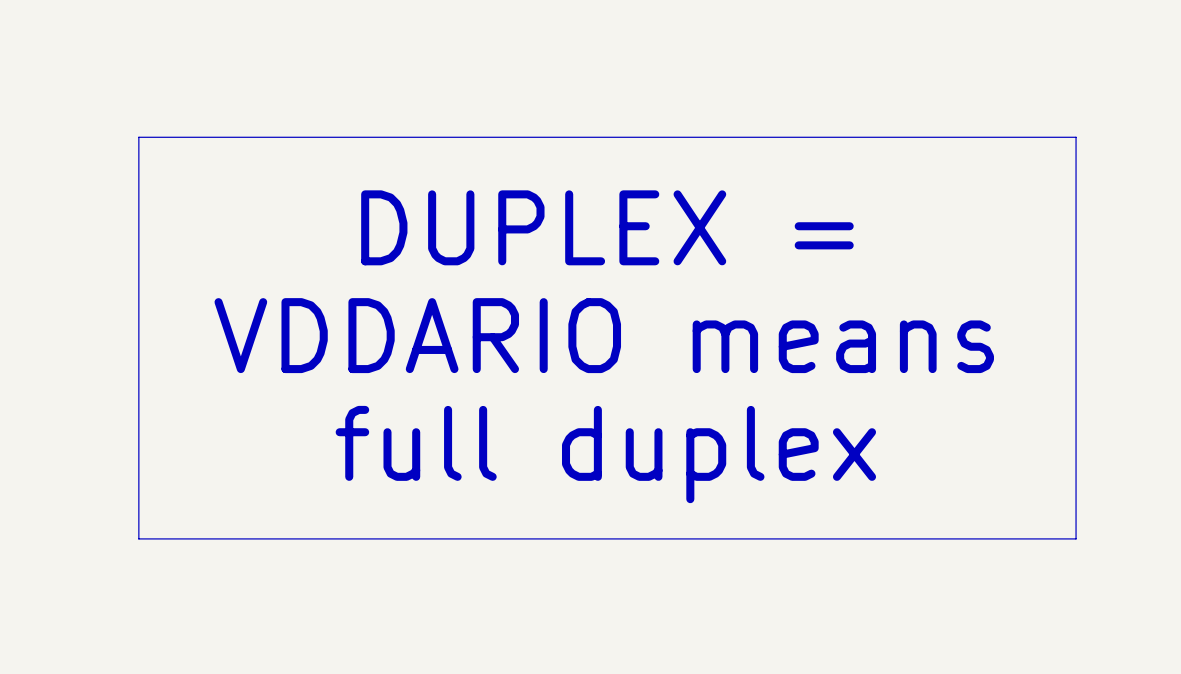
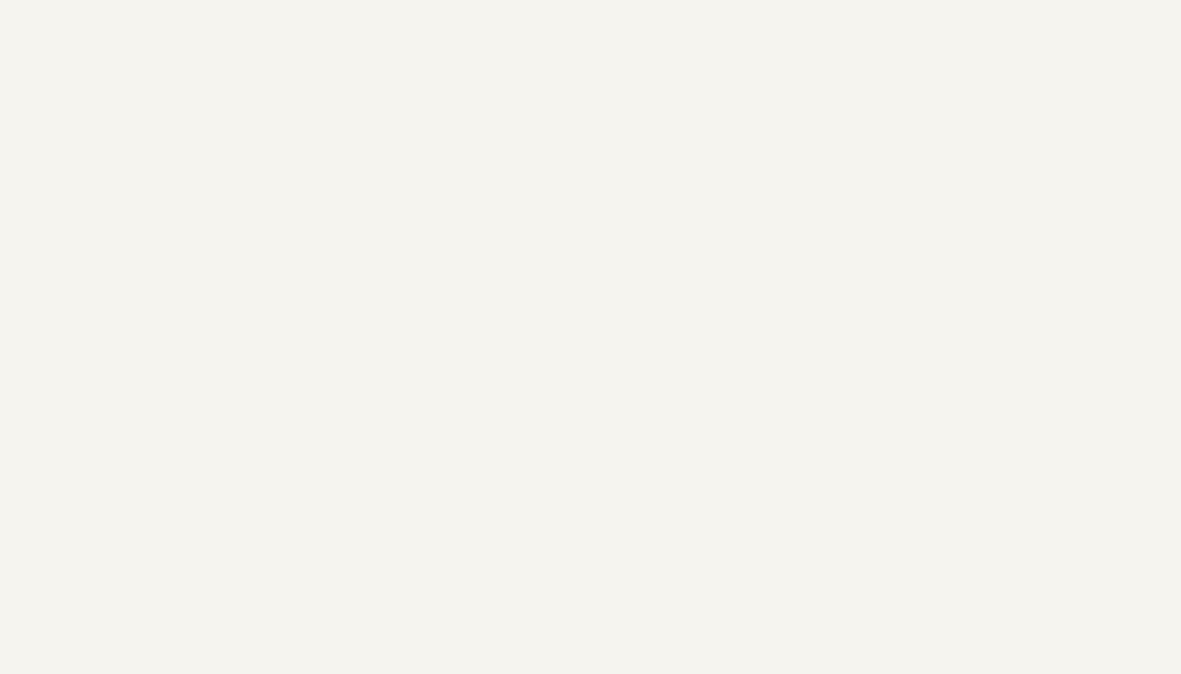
line: (138, 137) (1076, 137) (1076, 538) (138, 538) (138, 137) -> none
text: DUPLEX = (607, 227) -> none
text: VDDARIO means (604, 335) -> none
text: full duplex (605, 454) -> none

